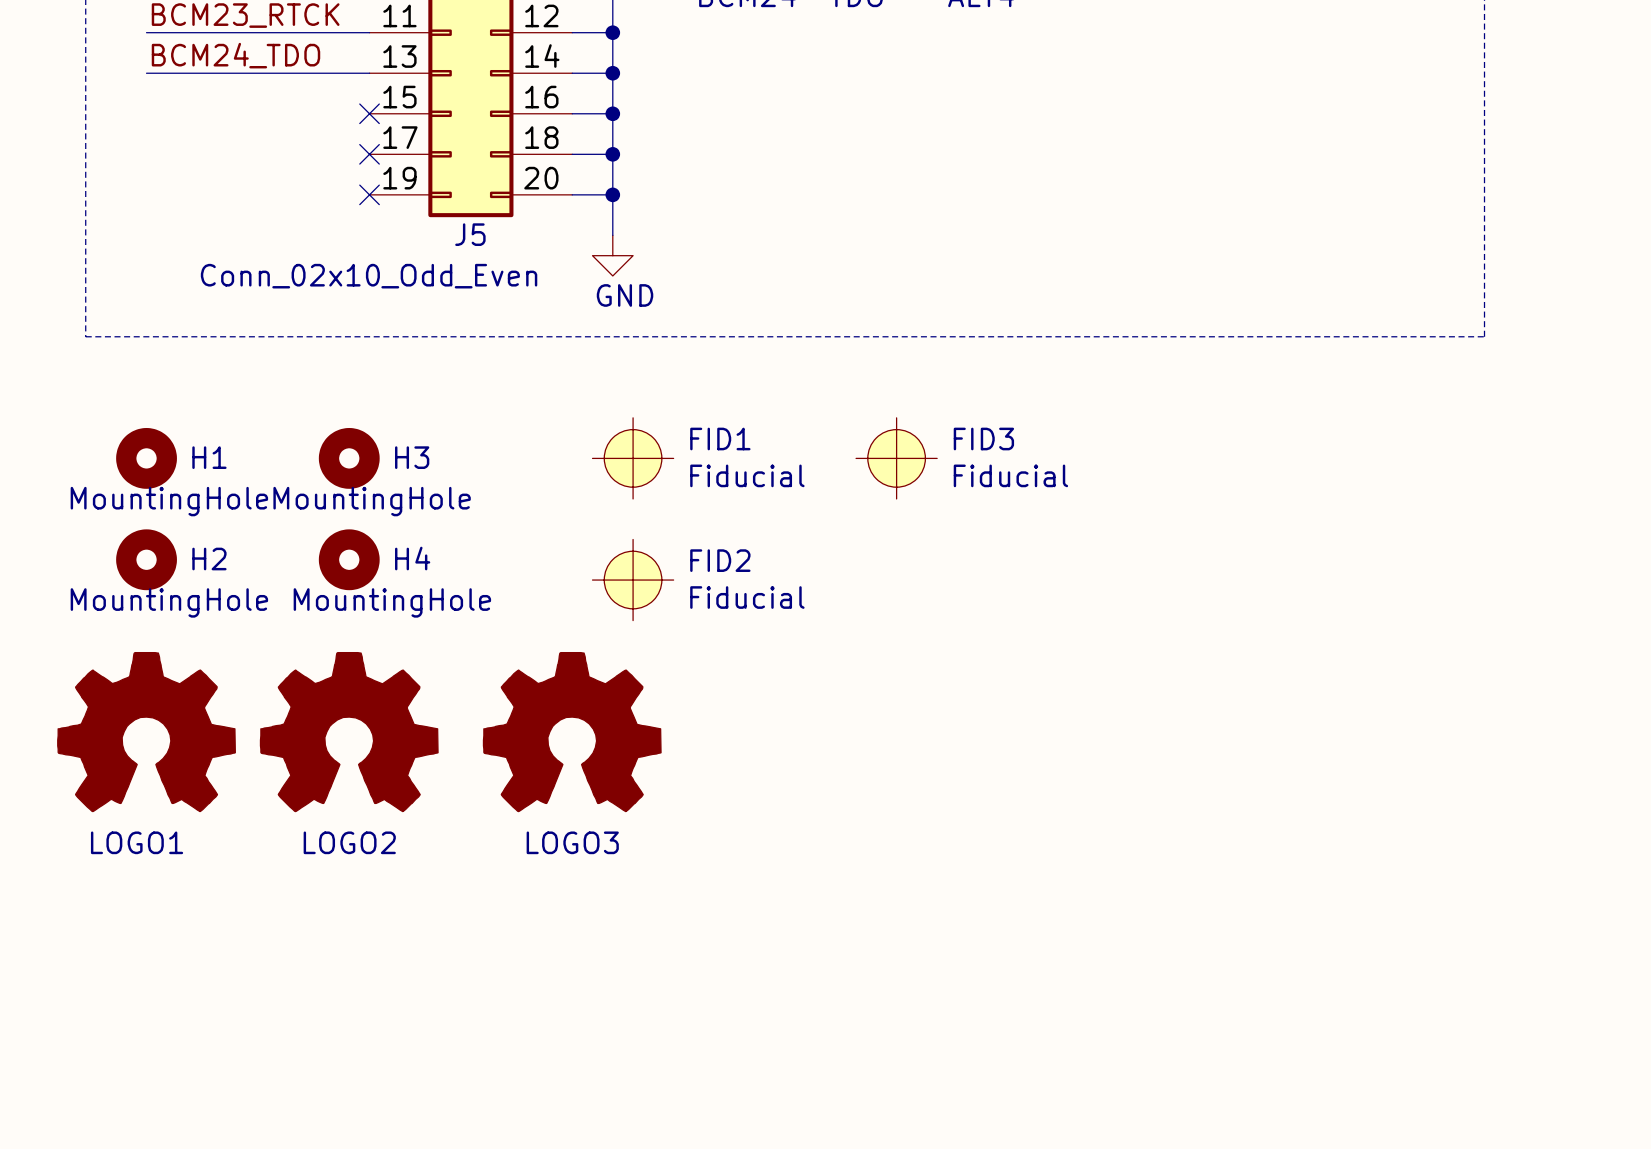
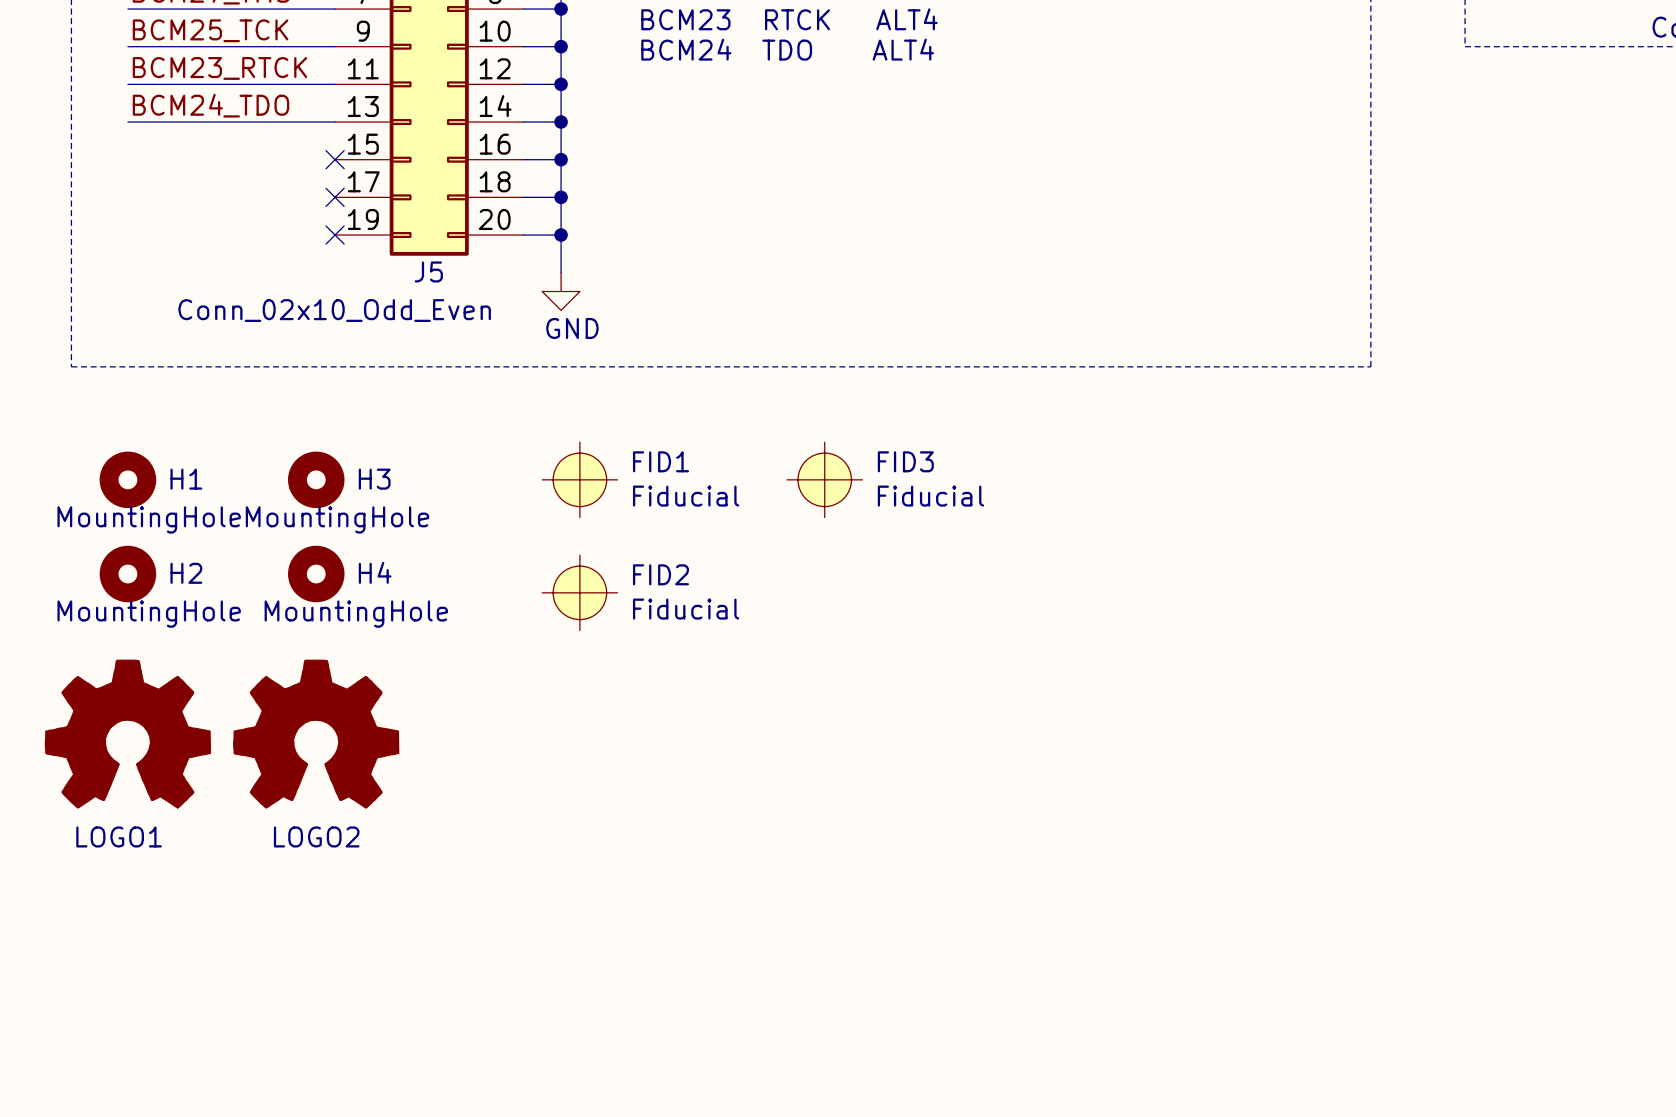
LOGO3: (572, 732) -> none

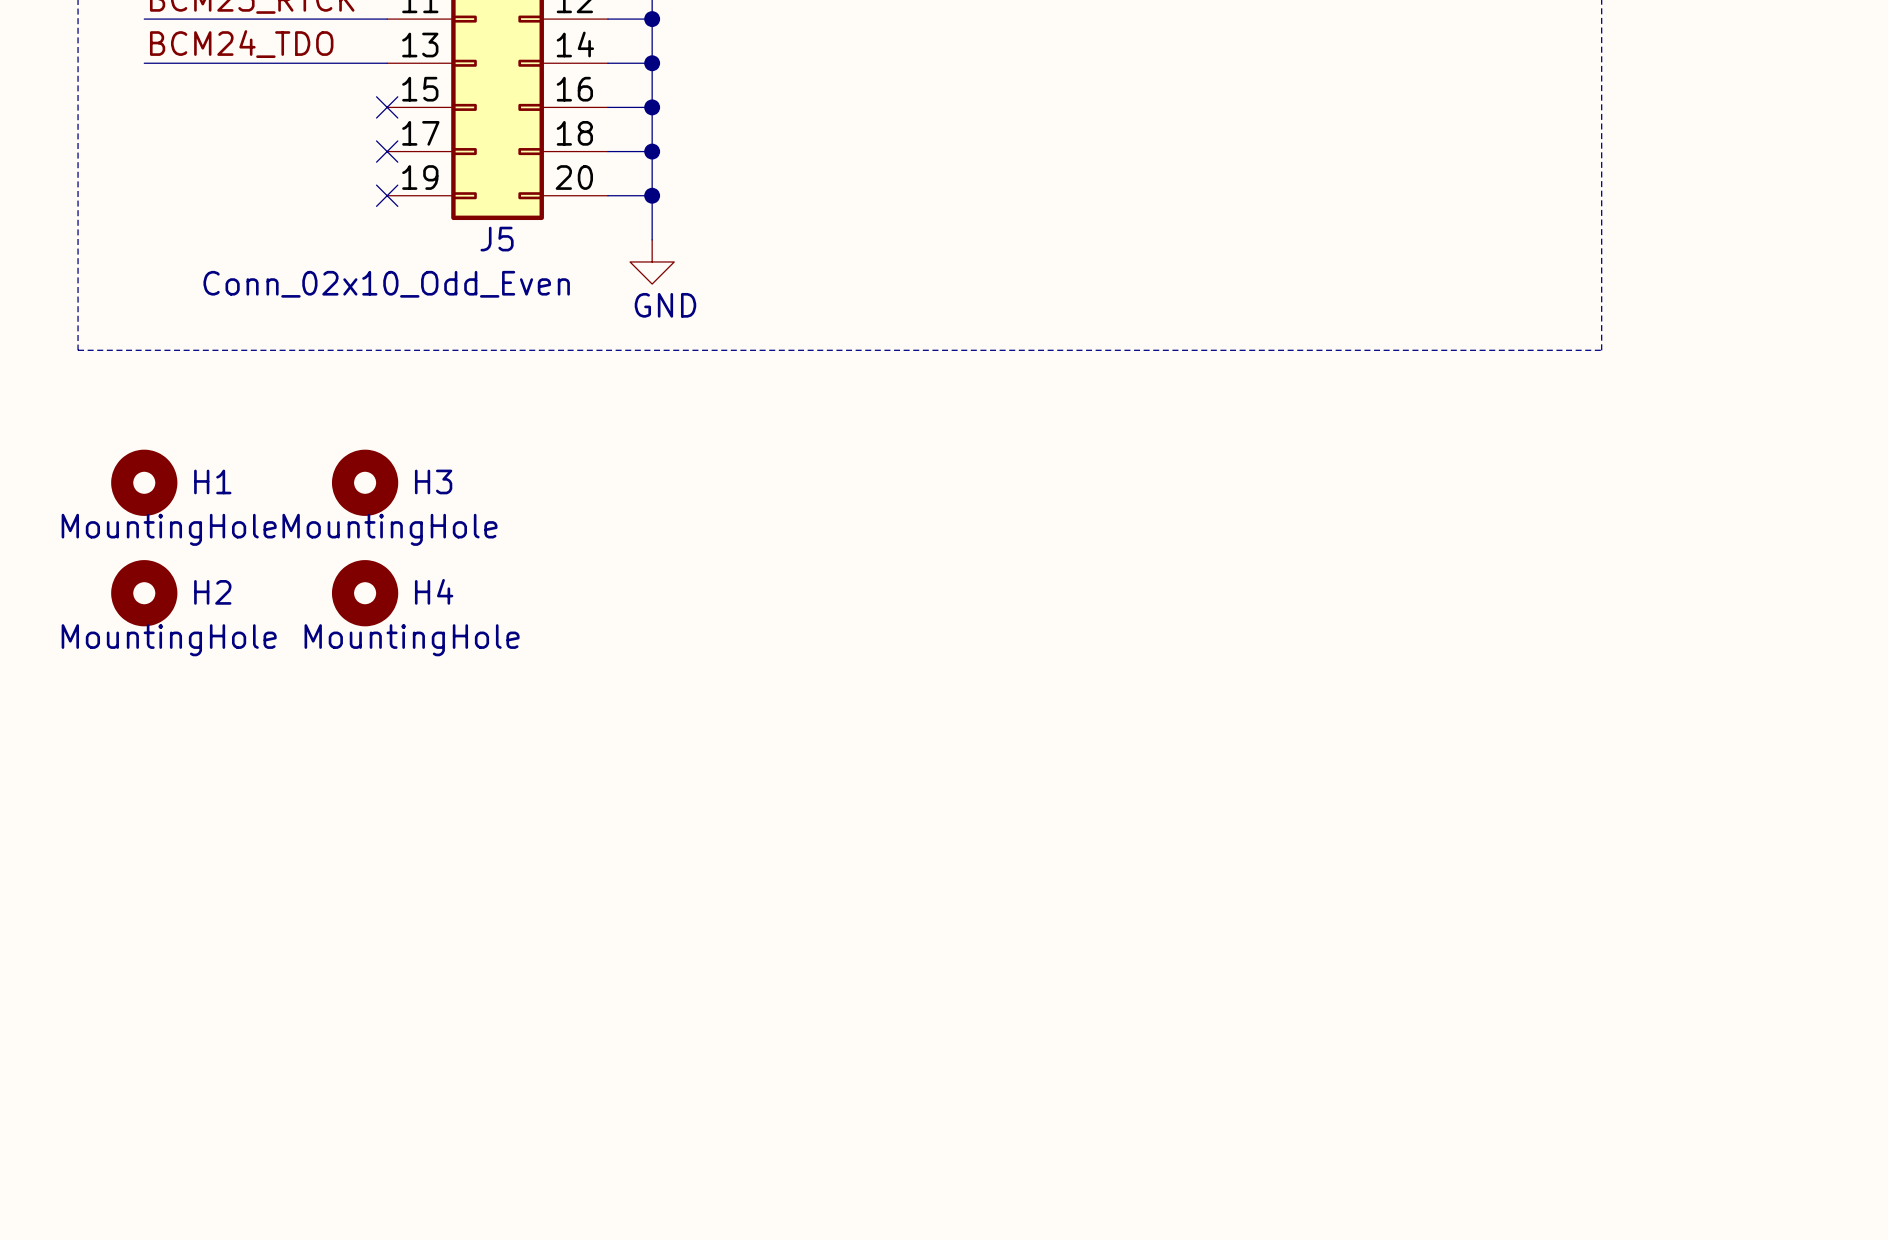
FID1: Fiducial (579, 479) -> none
FID3: Fiducial (824, 479) -> none
FID2: Fiducial (579, 592) -> none
LOGO1: (127, 734) -> none
LOGO2: (316, 734) -> none

